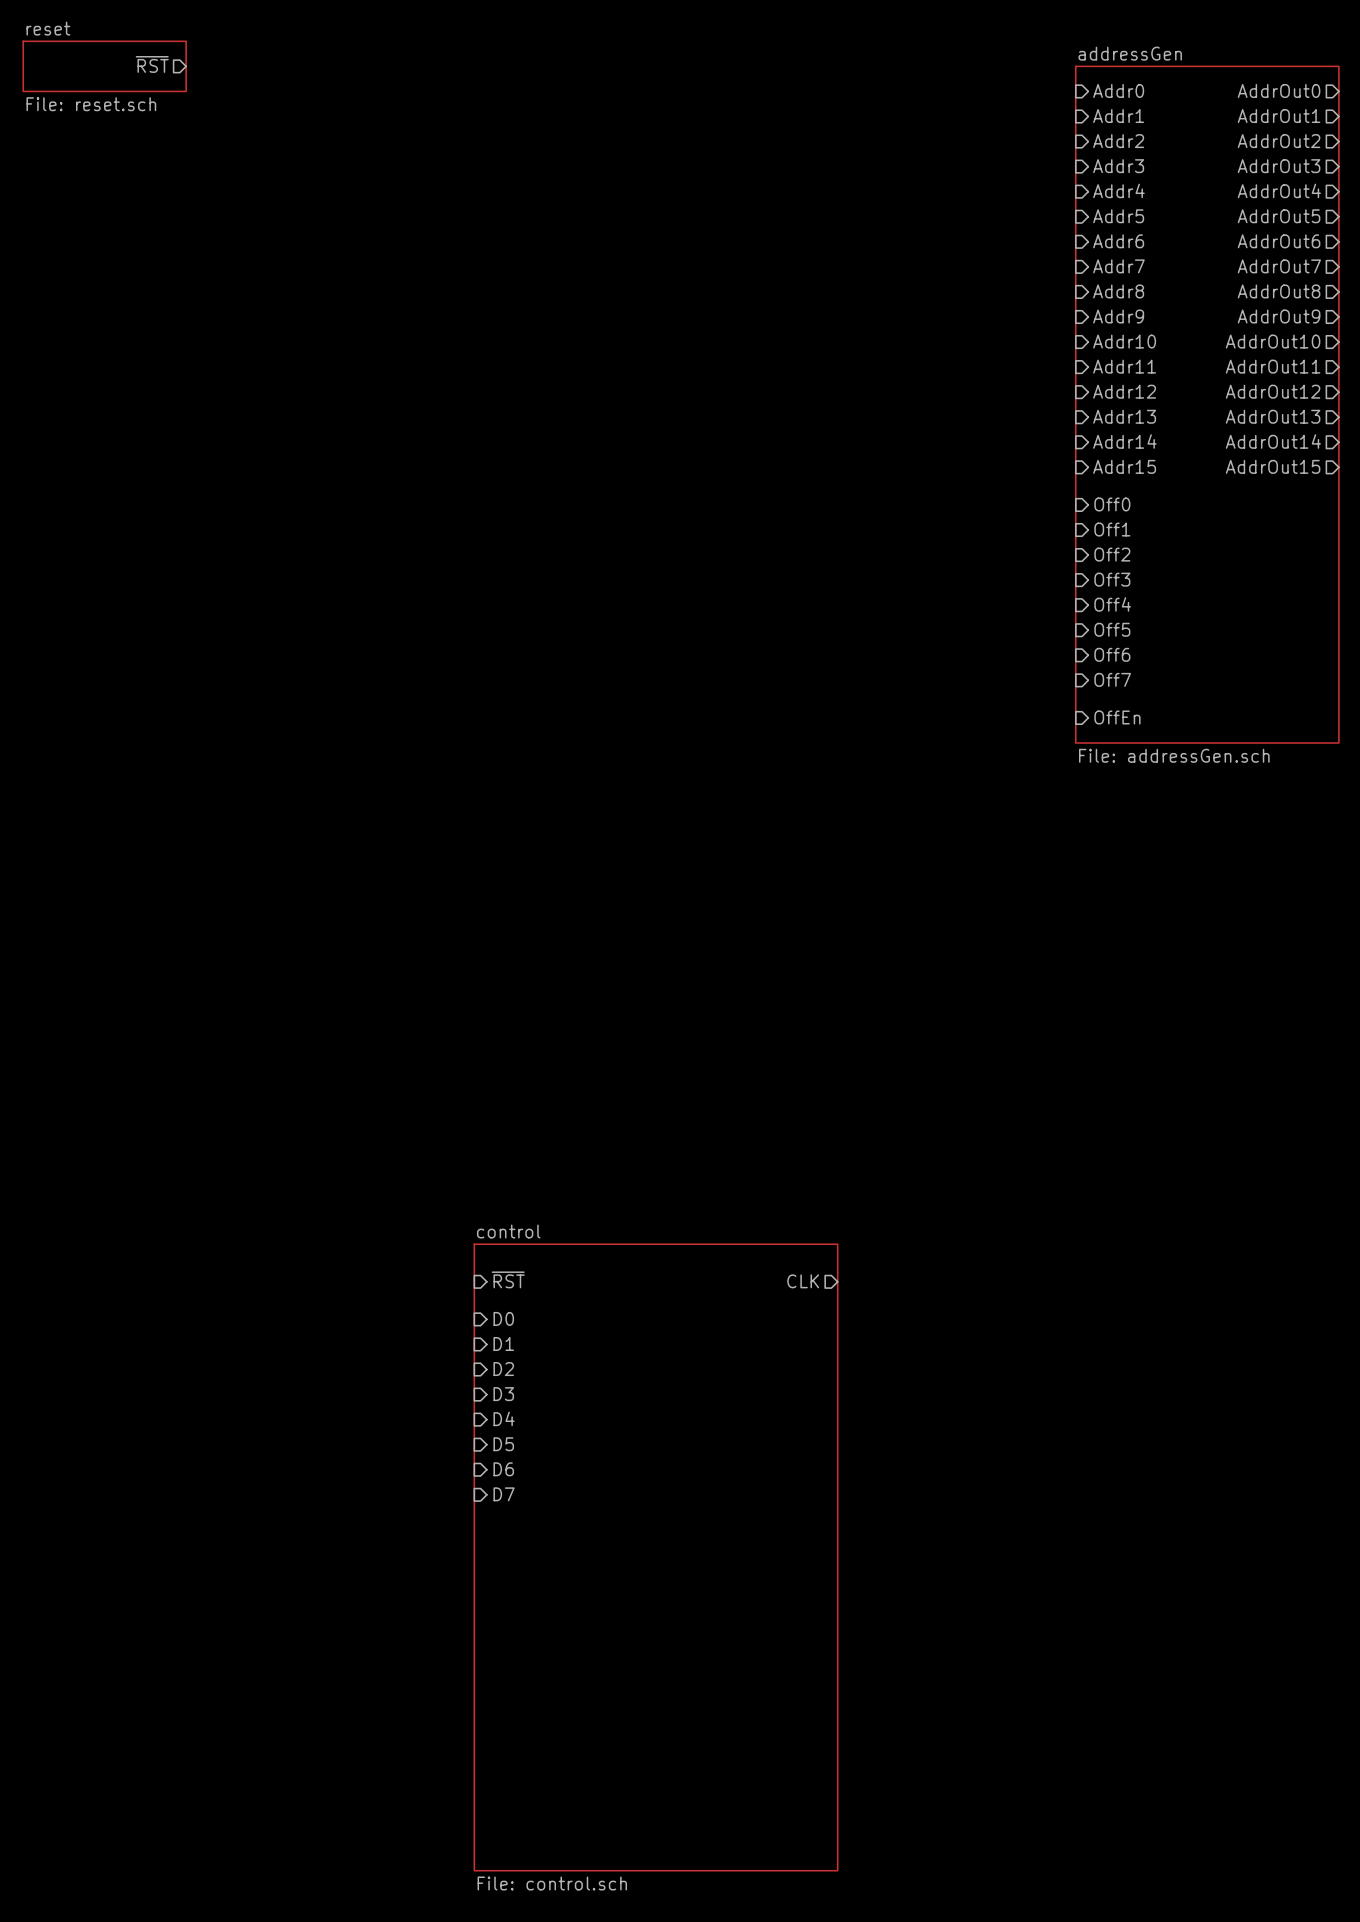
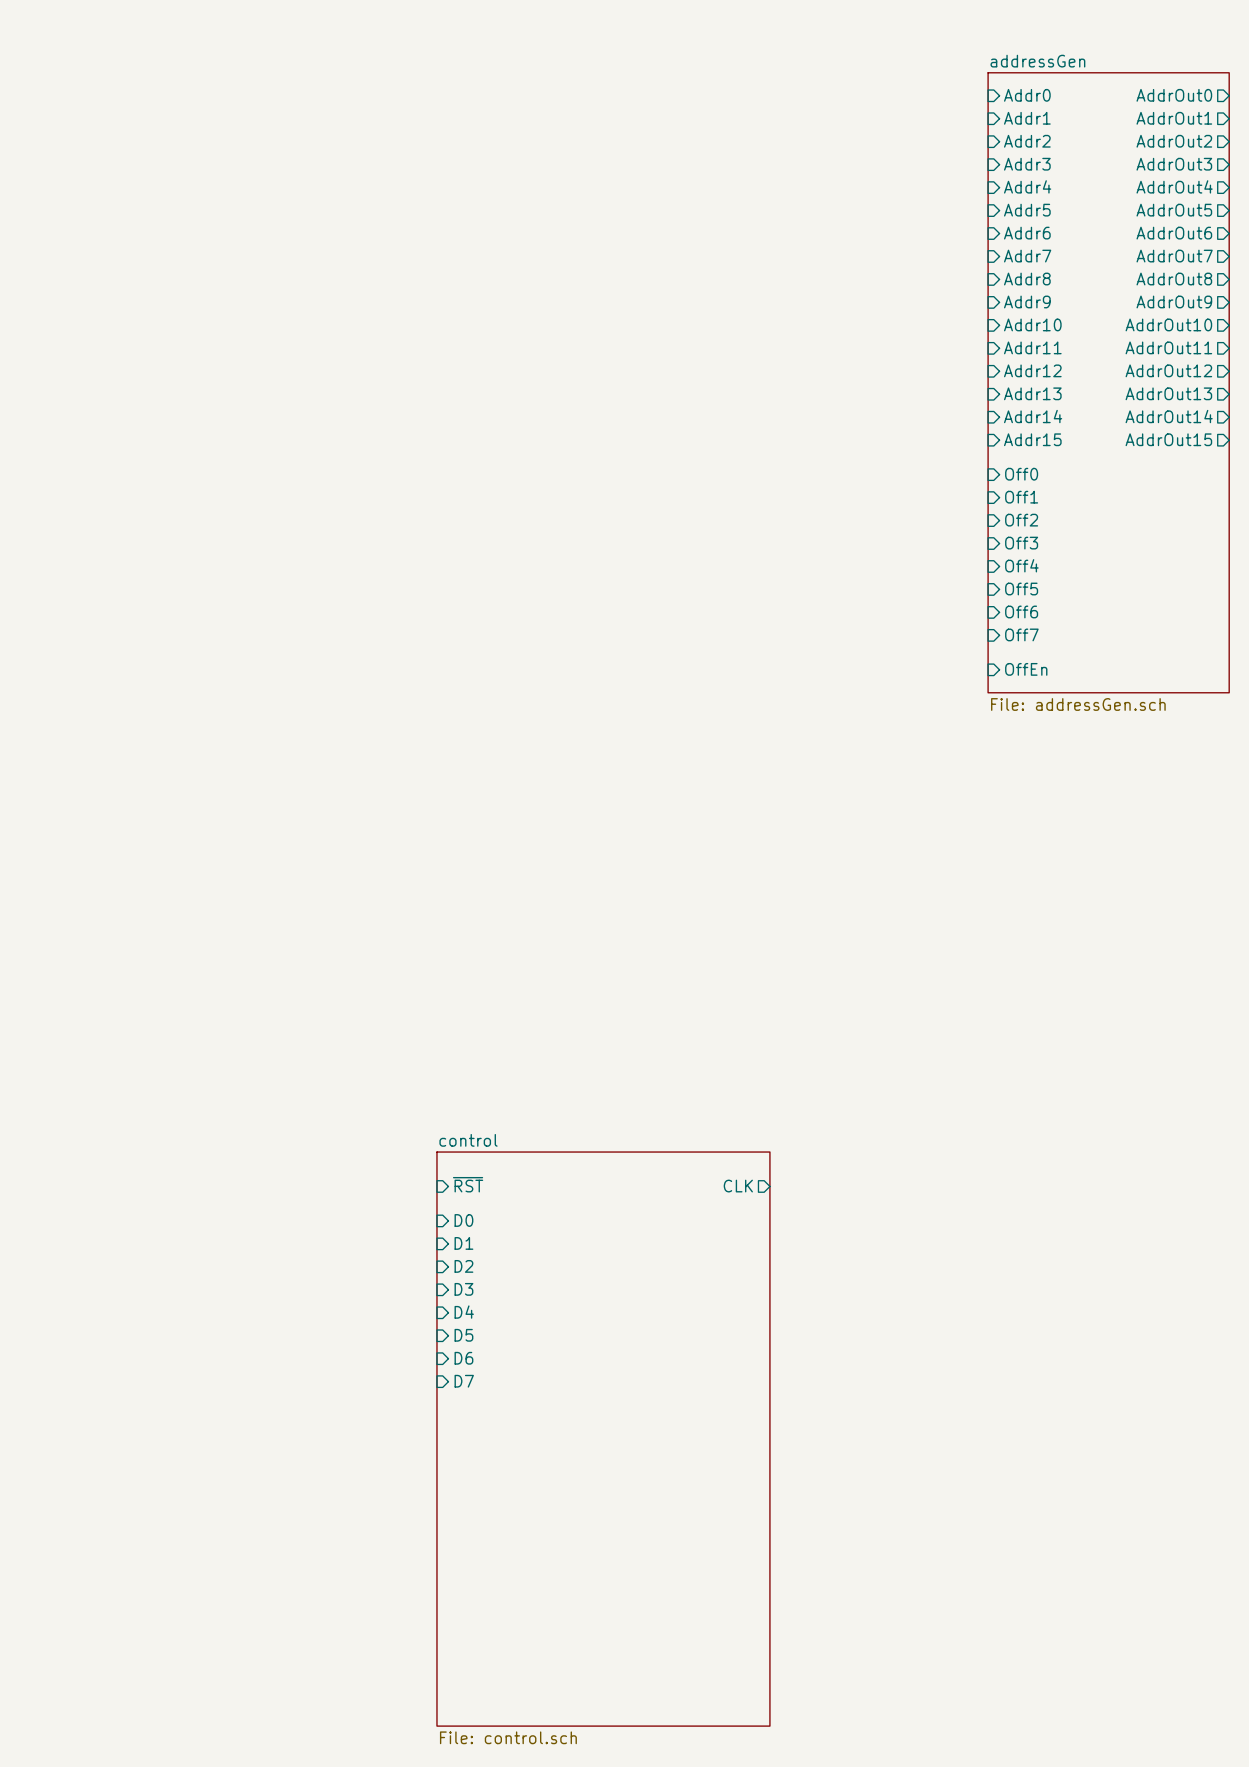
sheet pin: ~{RST} (152, 64) -> none
sheet reset: File: reset.sch (104, 66) -> none

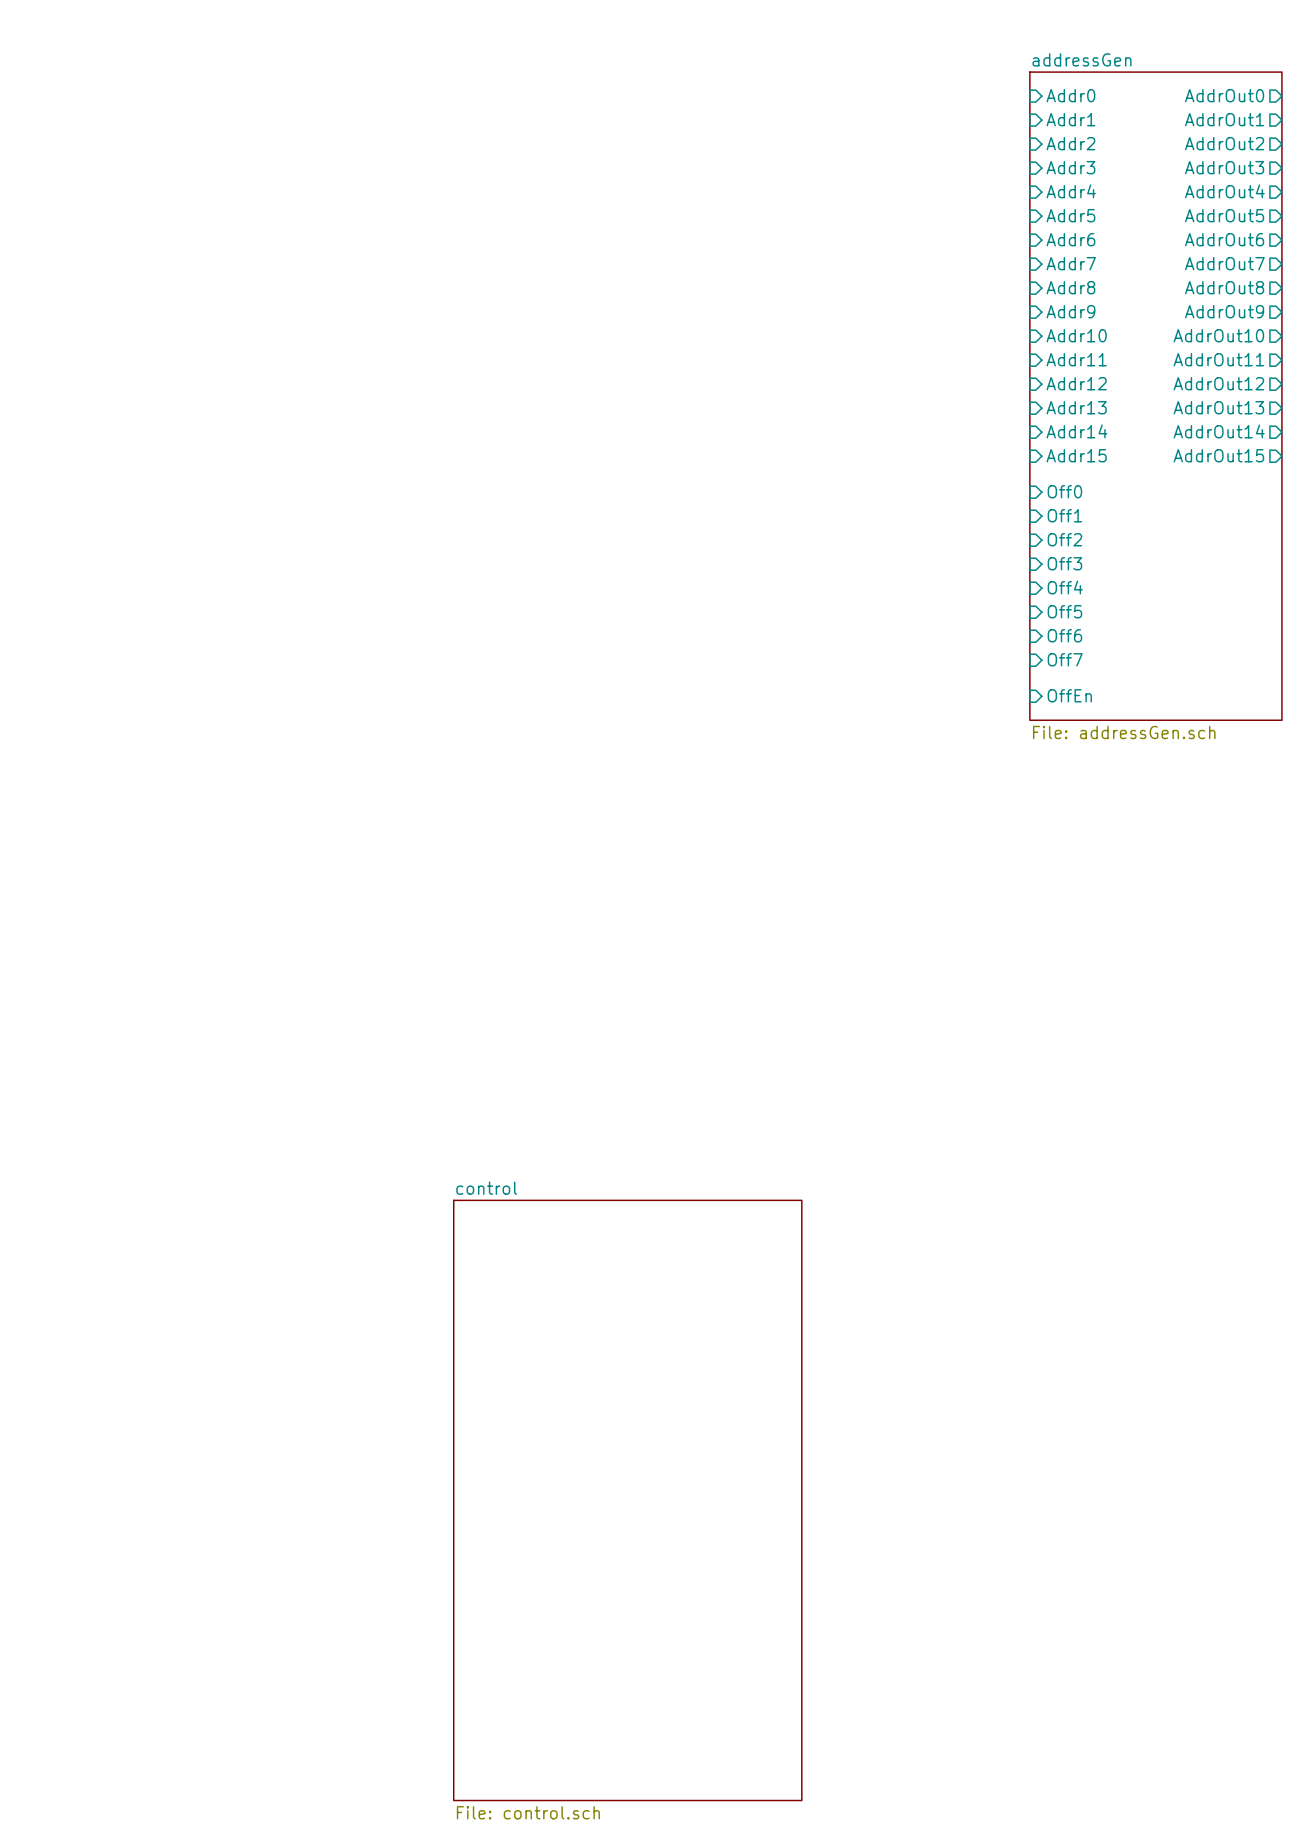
sheet pin: ~{RST} (468, 1184) -> none
sheet pin: CLK (738, 1186) -> none
sheet pin: D0 (463, 1220) -> none
sheet pin: D1 (463, 1243) -> none
sheet pin: D2 (463, 1266) -> none
sheet pin: D3 (463, 1289) -> none
sheet pin: D4 (464, 1312) -> none
sheet pin: D5 (463, 1335) -> none
sheet pin: D6 (463, 1358) -> none
sheet pin: D7 (464, 1381) -> none

